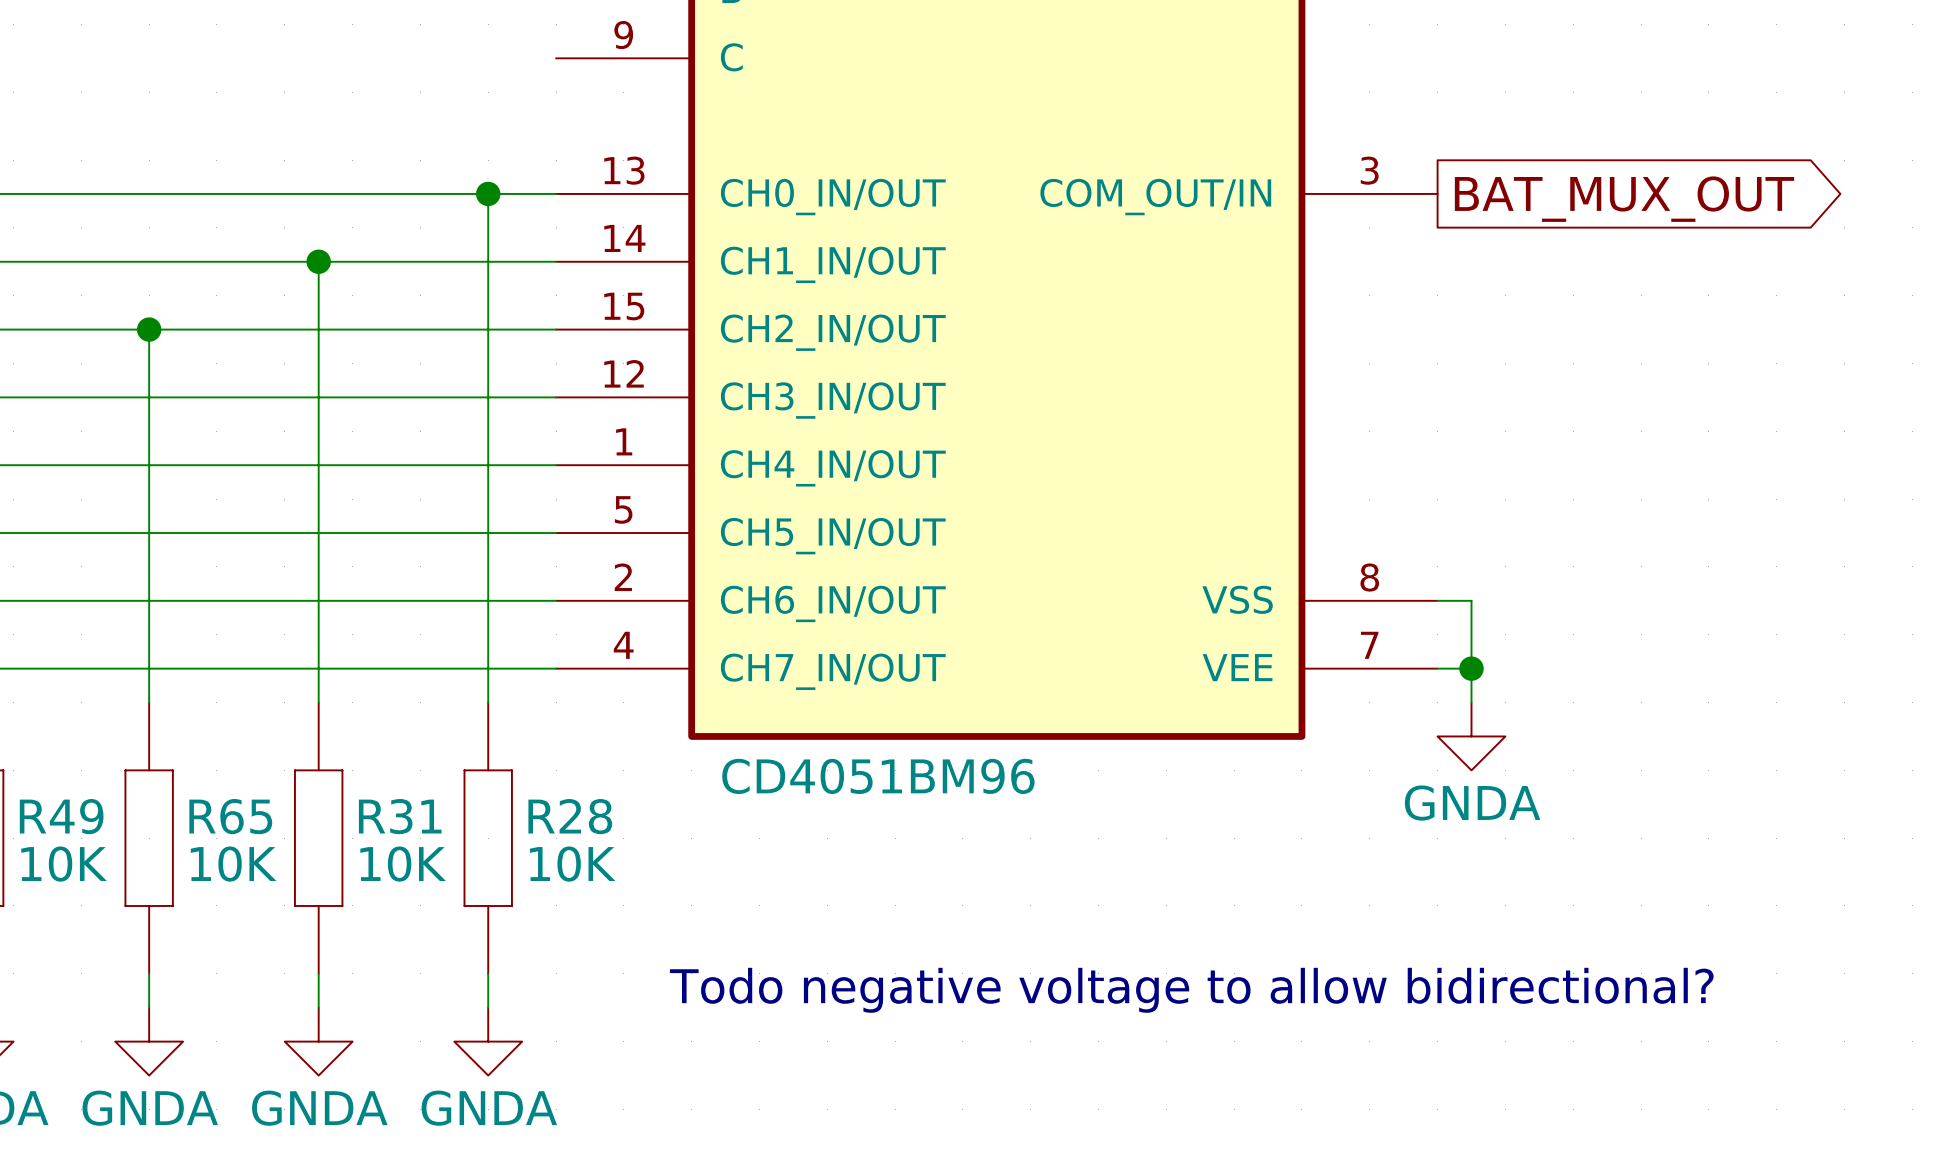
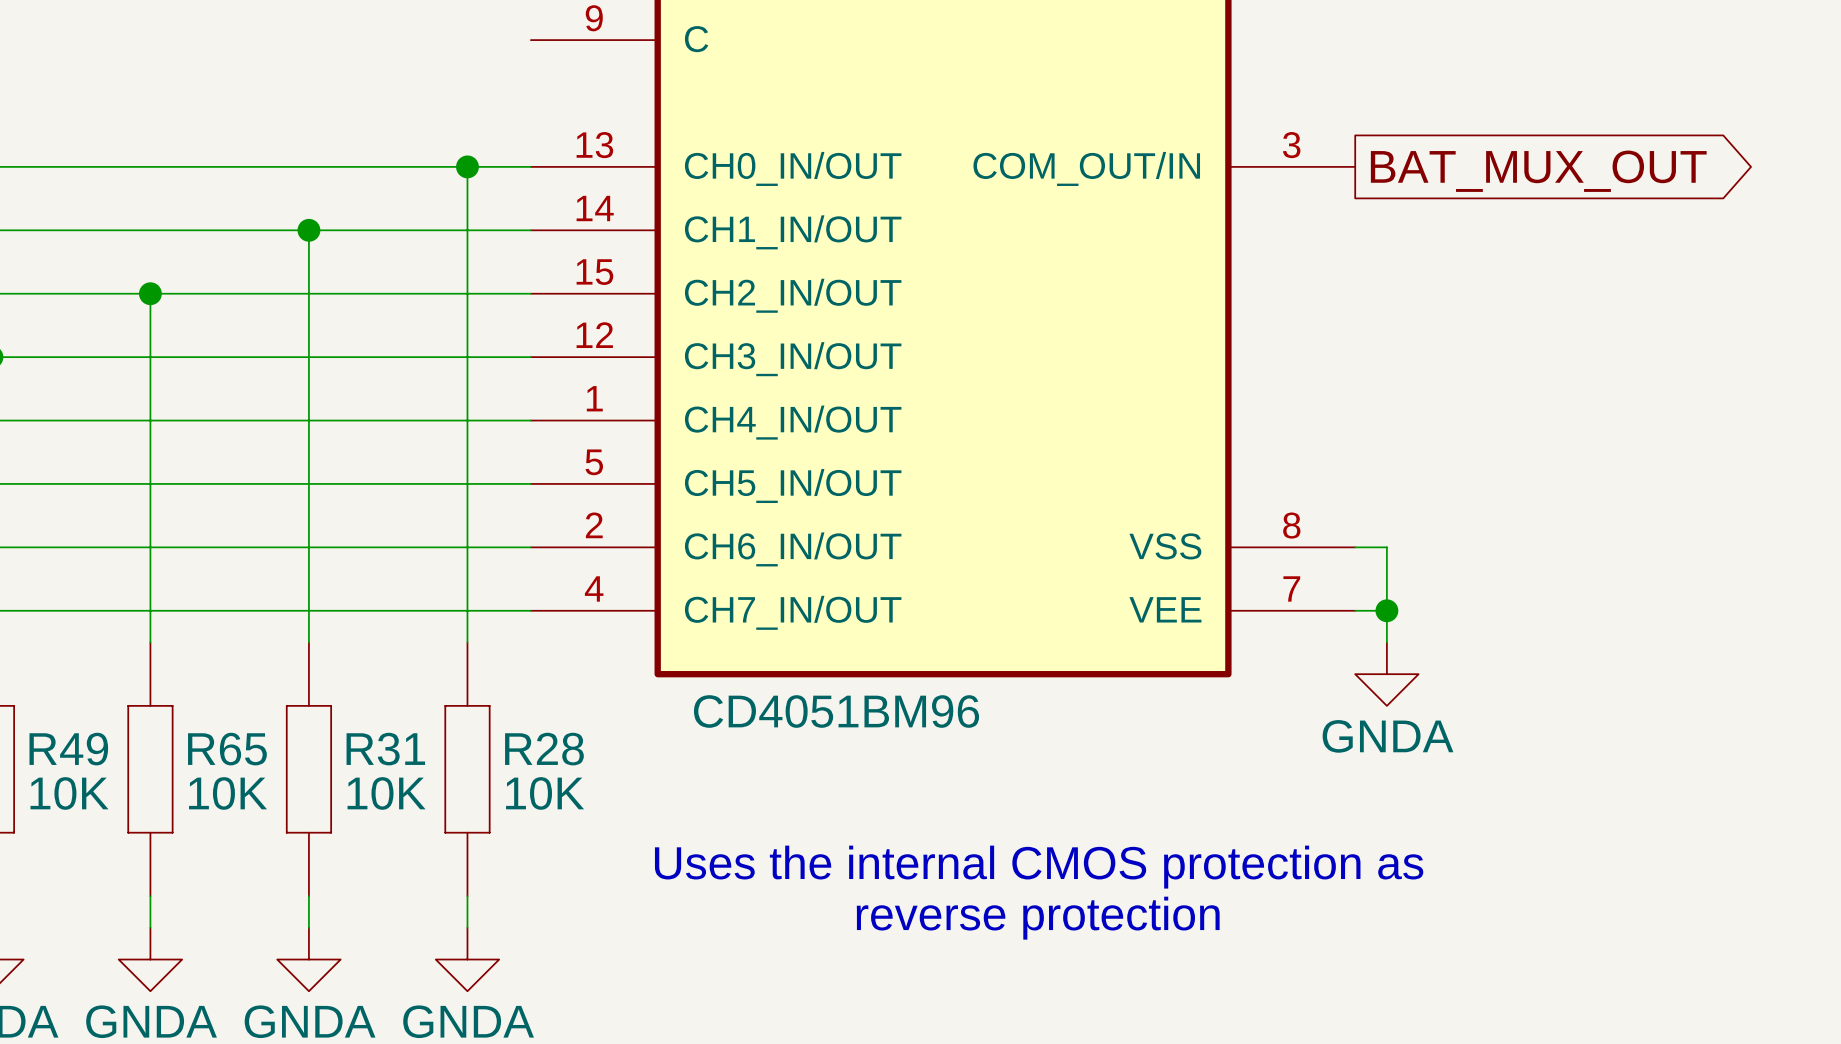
text: none -> Uses the internal CMOS protection as (1039, 867)
text: Todo negative voltage to allow bidirectional? (1191, 990) -> none
text: none -> reverse protection (1038, 918)

